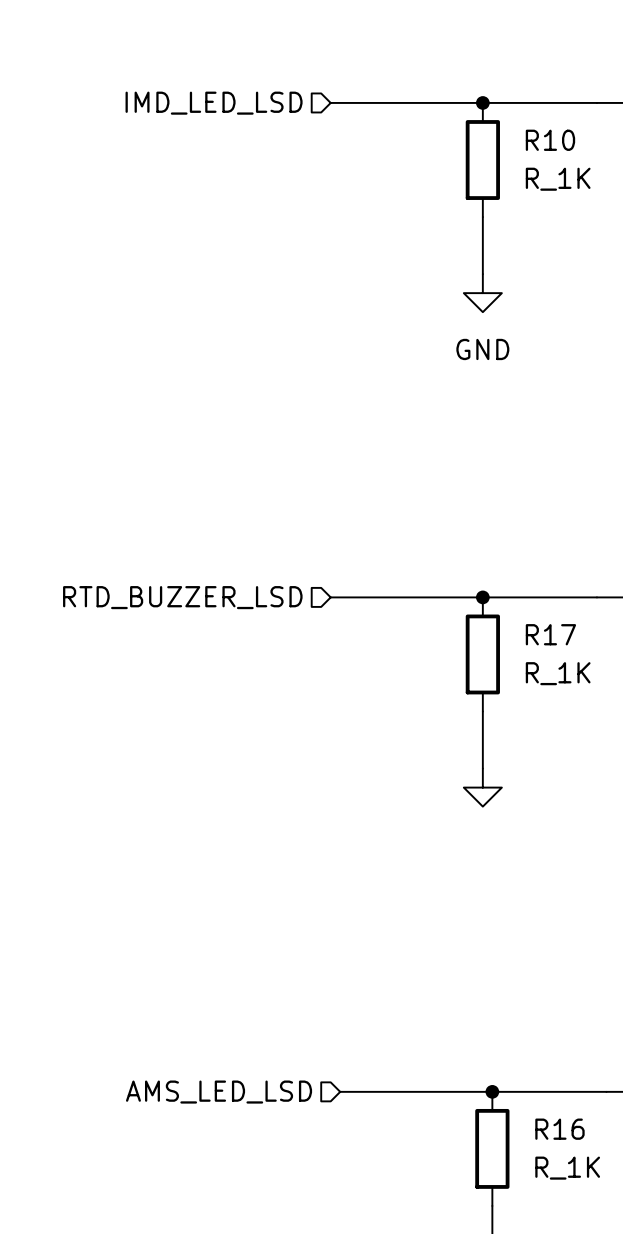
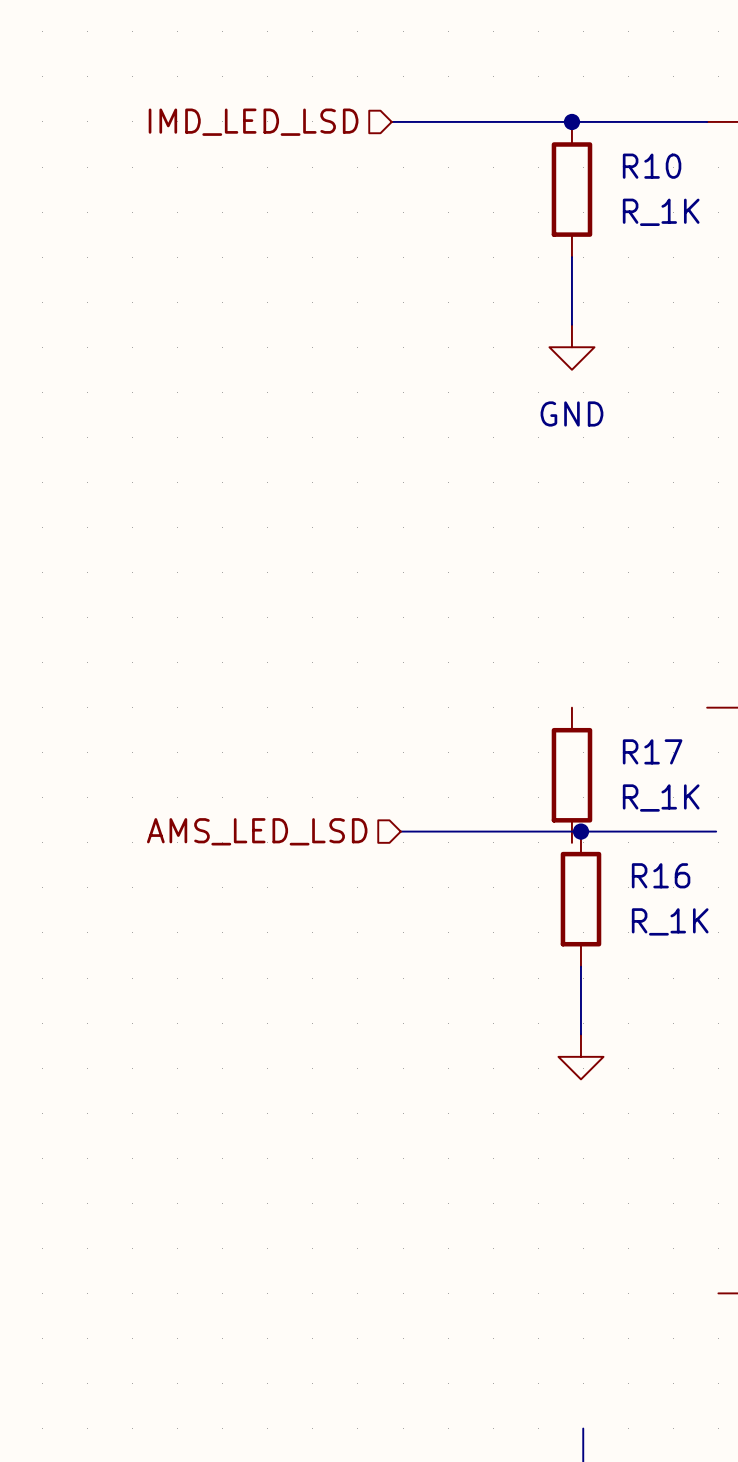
hierarchical label: RTD_BUZZER_LSD (182, 597) -> none
wire: (330, 597) (596, 597) -> (400, 831) (716, 831)
junction: (482, 597) -> none
hierarchical label: none -> AMS_LED_LSD (257, 831)
junction: none -> (580, 831)
wire: (482, 711) (482, 768) -> (580, 966) (580, 1034)
power symbol position: (482, 787) -> (580, 1056)
wire: (340, 1091) (606, 1091) -> none
junction: (492, 1091) -> none
hierarchical label: AMS_LED_LSD (219, 1092) -> none
R16 position: (492, 1148) -> (580, 899)

